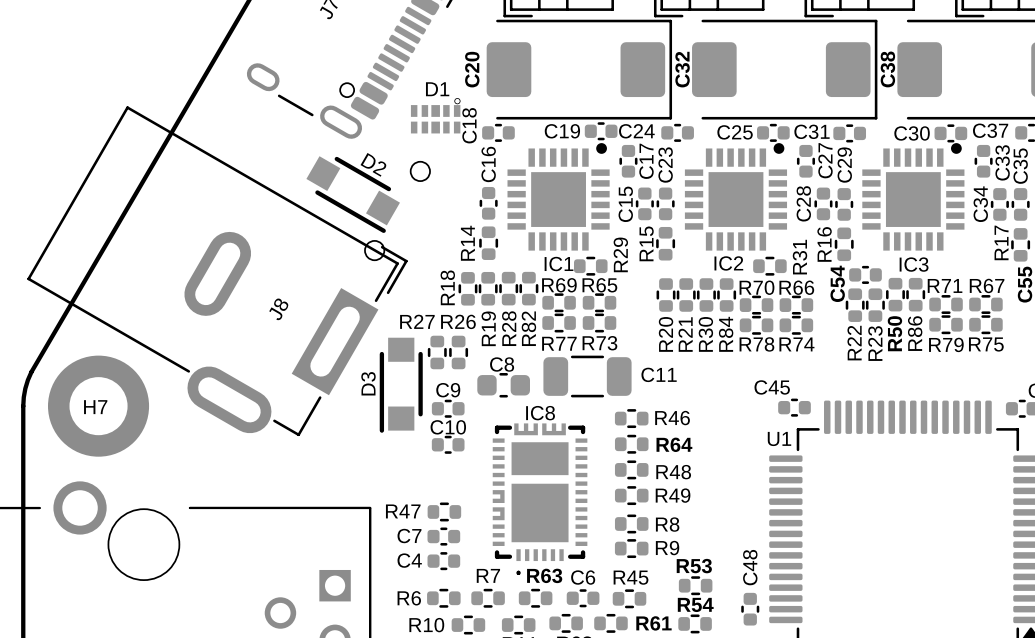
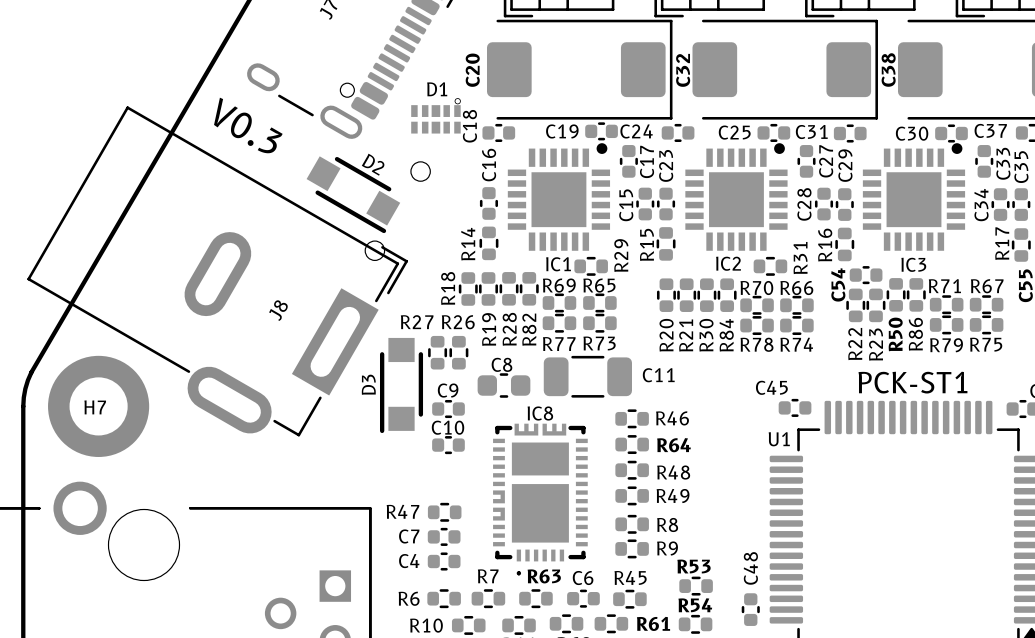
text: none -> V0.3 (248, 125)
text: none -> PCK-ST1 (912, 382)

